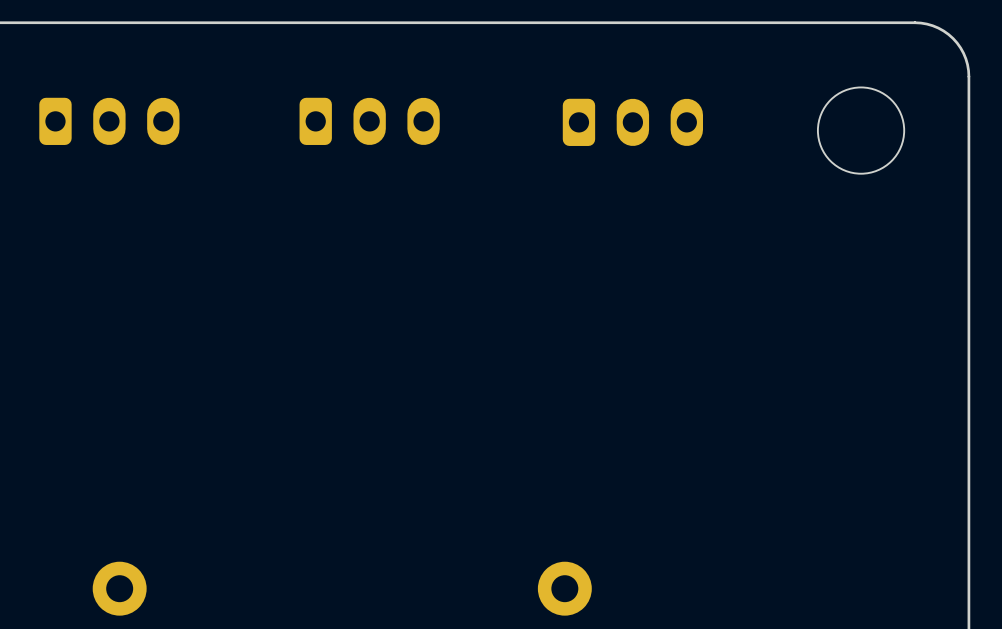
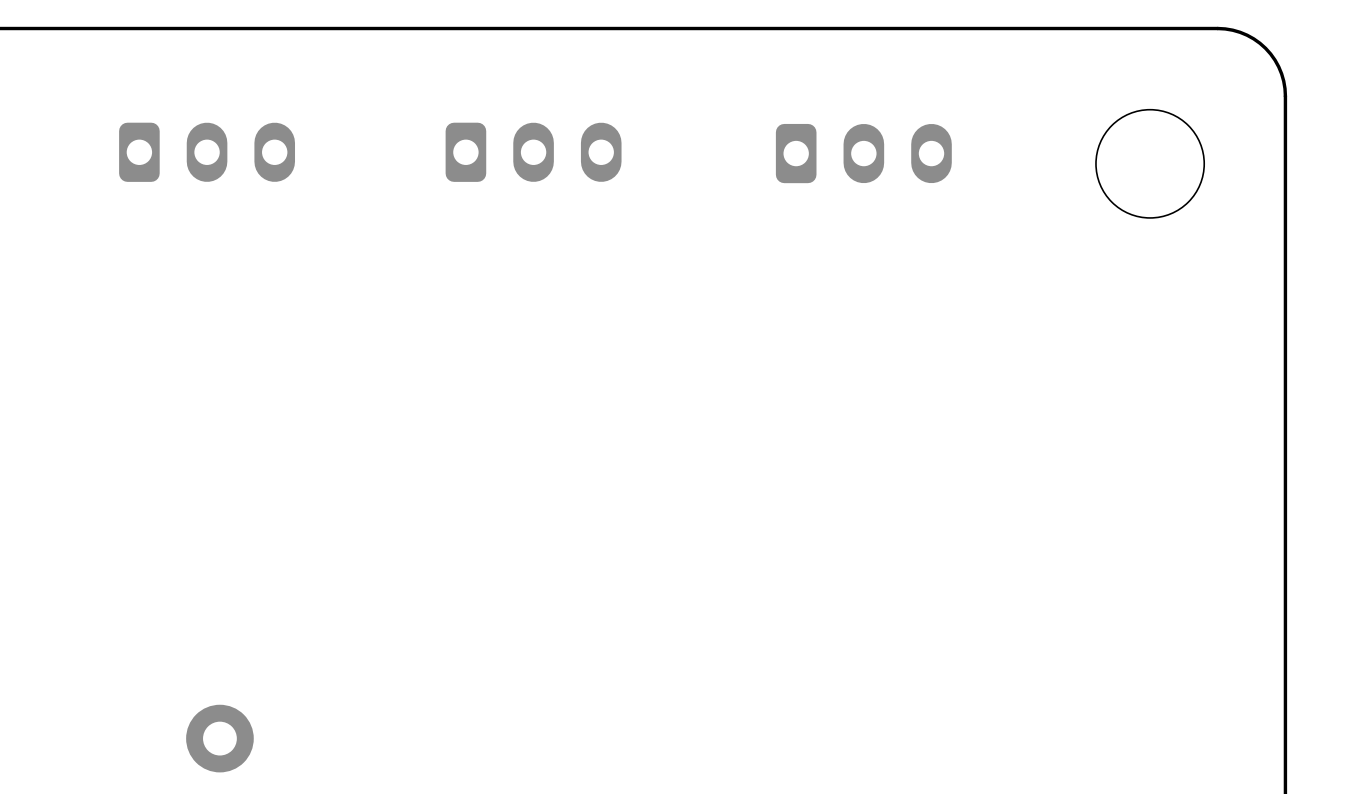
part: (564, 588) -> none

